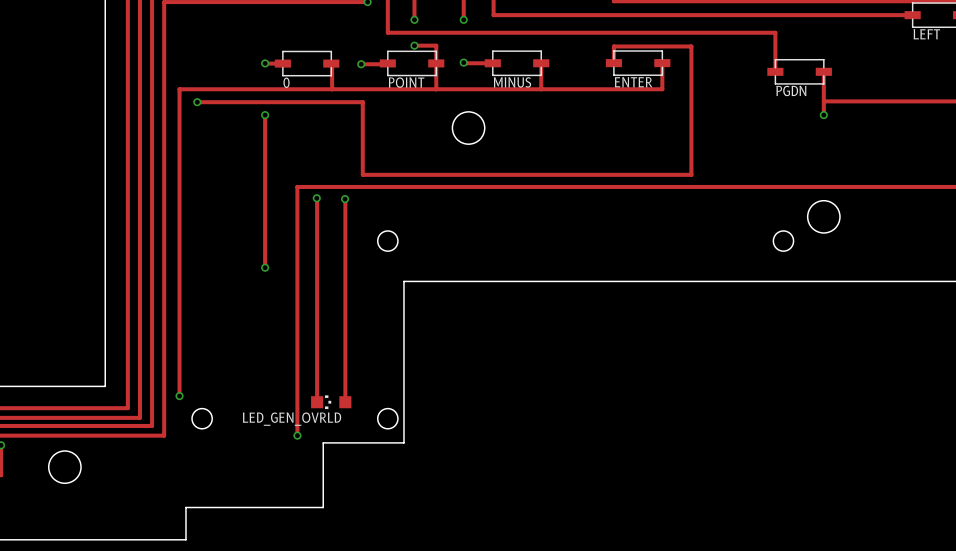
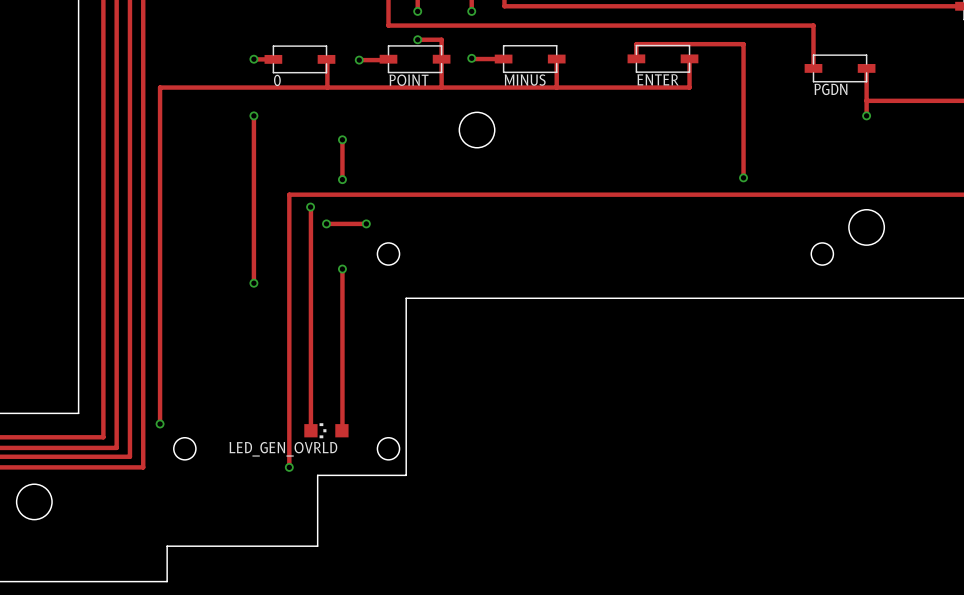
track: (613, 49) (613, 46) (691, 46) (691, 174) (362, 174) (362, 102) (197, 102) -> (636, 44) (743, 44) (743, 177)
via: (197, 102) -> none
track: none -> (342, 139) (342, 179)
via: none -> (342, 139)
via: none -> (743, 177)
via: none -> (342, 179)
track: (345, 199) (345, 402) -> (342, 269) (341, 430)
via: (345, 199) -> none
track: none -> (326, 223) (366, 223)
via: none -> (326, 223)
via: none -> (366, 223)
via: none -> (342, 269)

